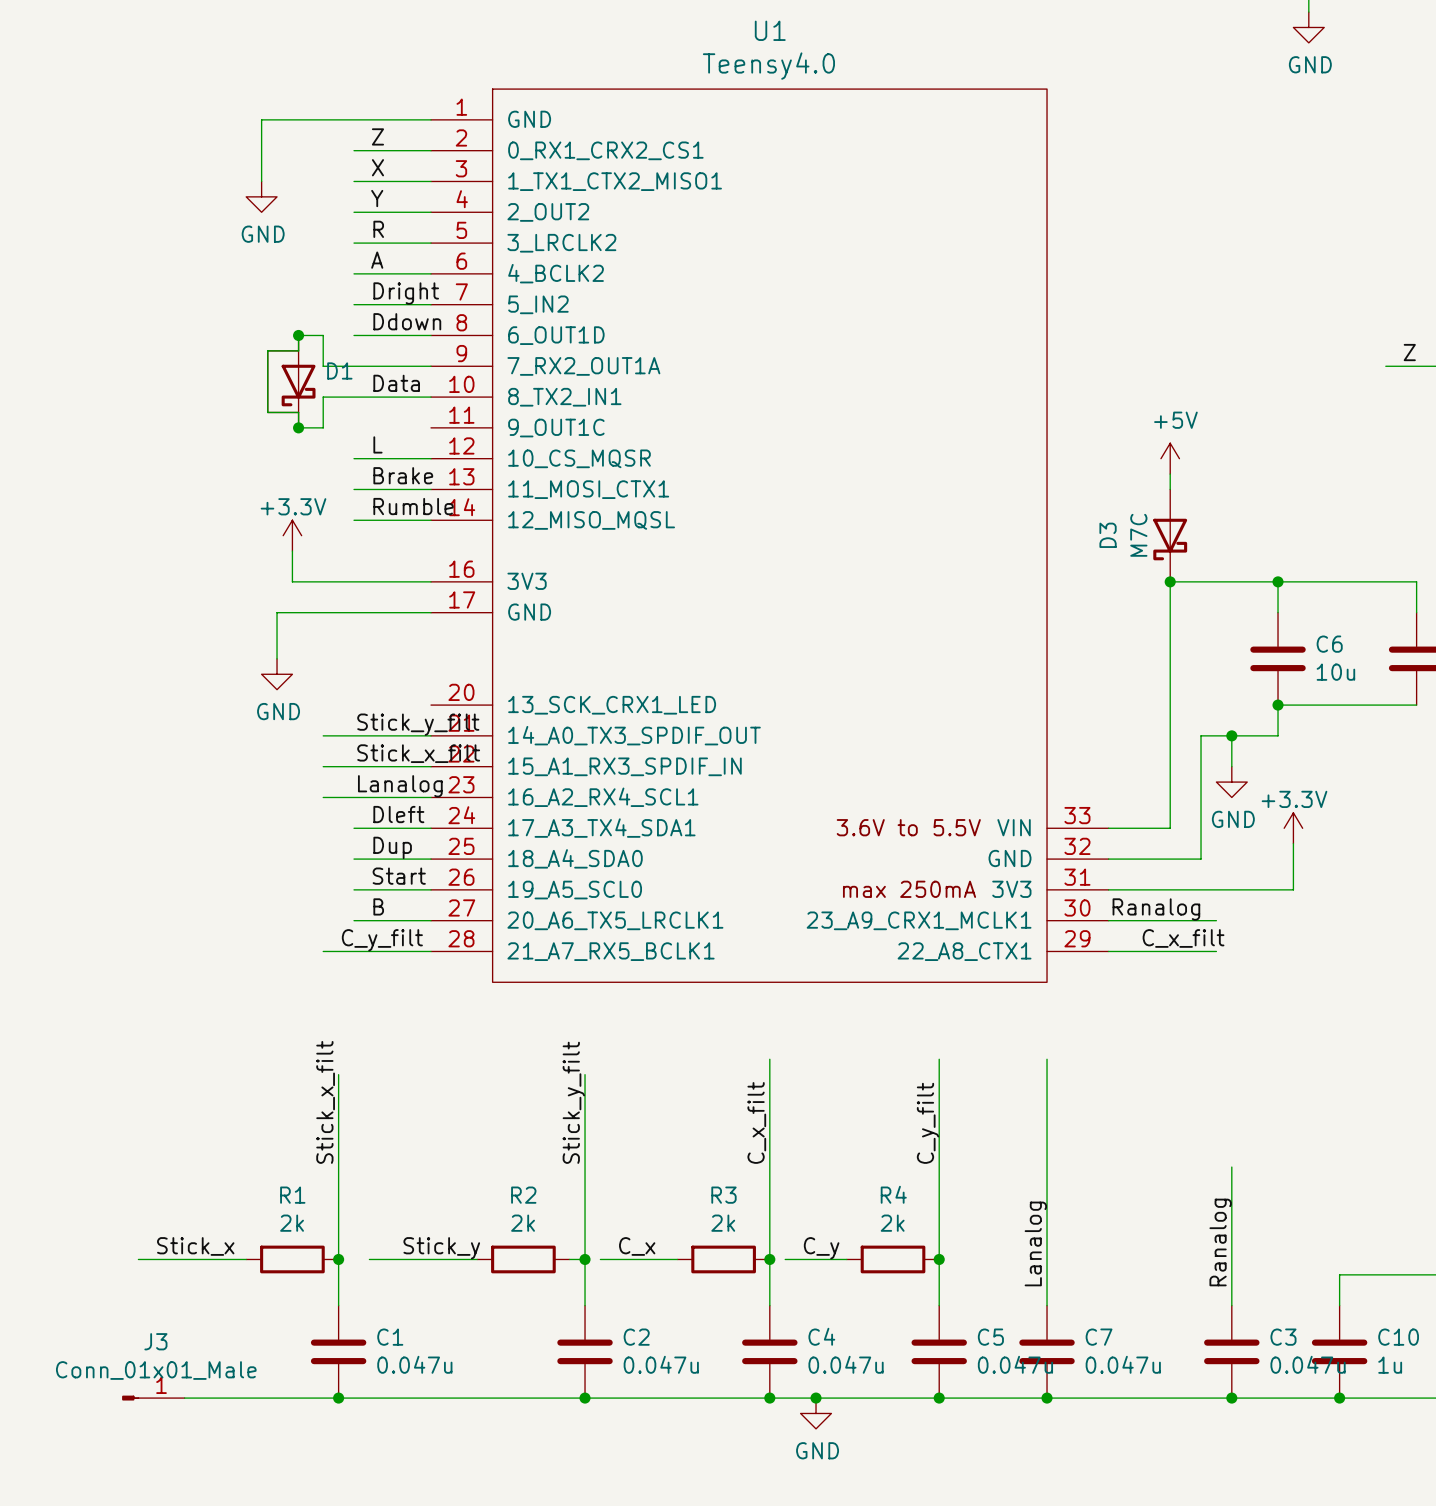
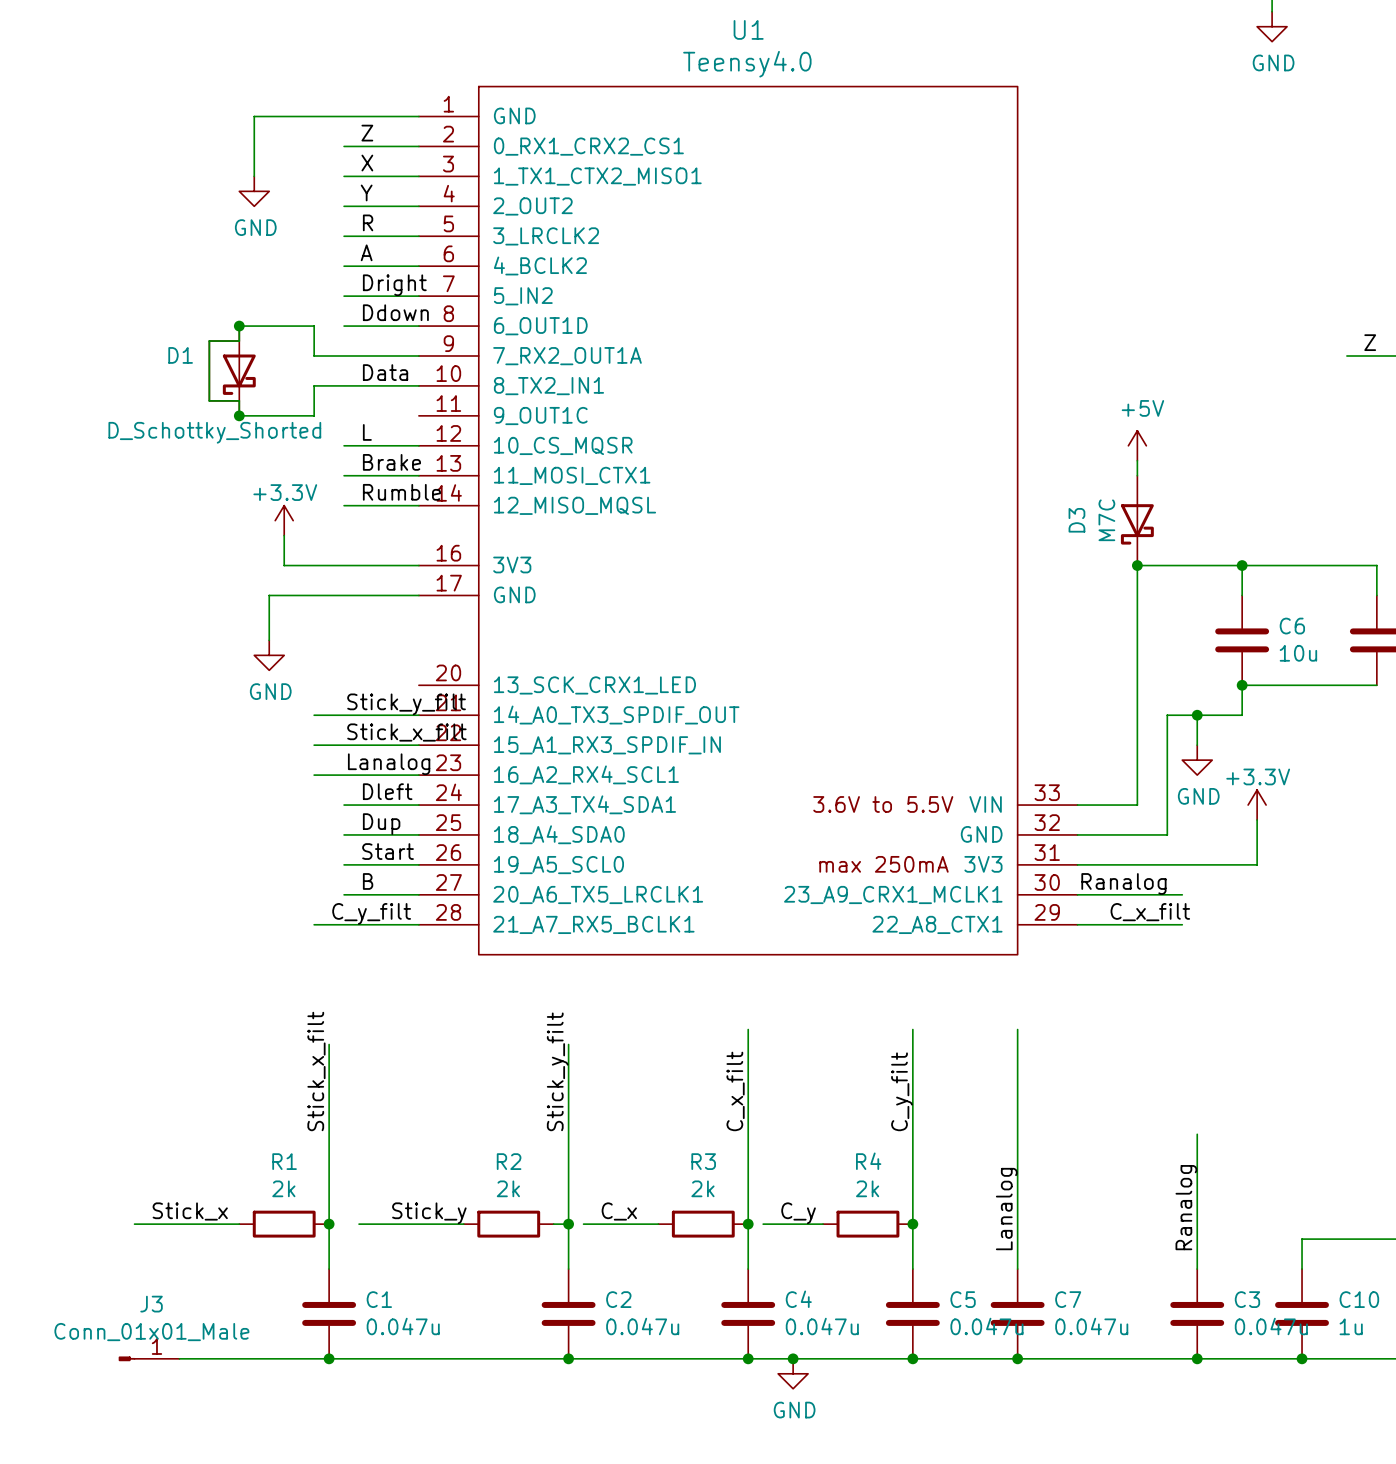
wire: (298, 335) (298, 350) (267, 350) (267, 412) (298, 412) (298, 427) -> (290, 326) (239, 326) (239, 341) (209, 341) (209, 400) (239, 400) (239, 415) (290, 415)
junction position: (298, 335) -> (239, 326)
D1 name position: D1 (339, 370) -> D1 (180, 355)
D1 position: (291, 381) -> (232, 370)
junction position: (298, 427) -> (239, 415)
D1 value: none -> D_Schottky_Shorted (214, 432)

